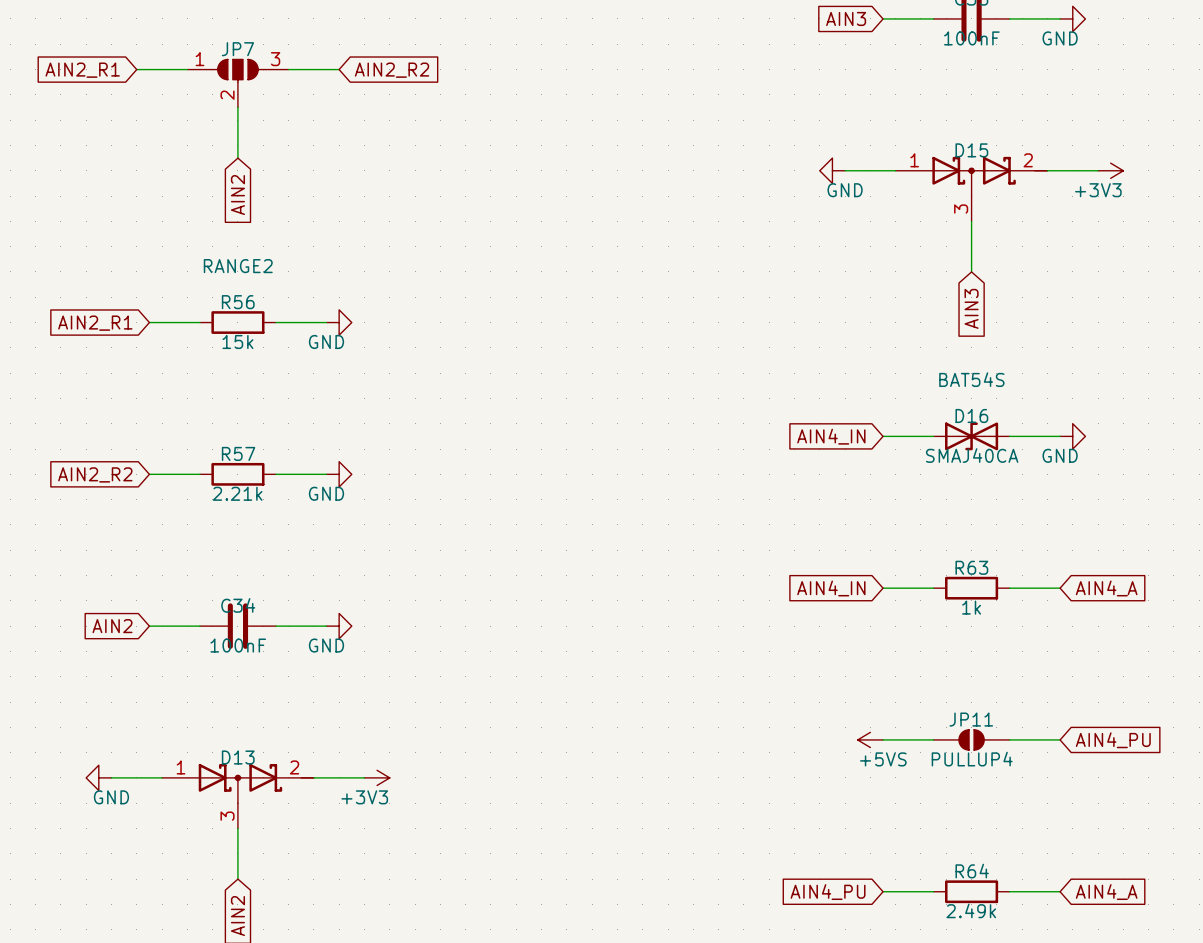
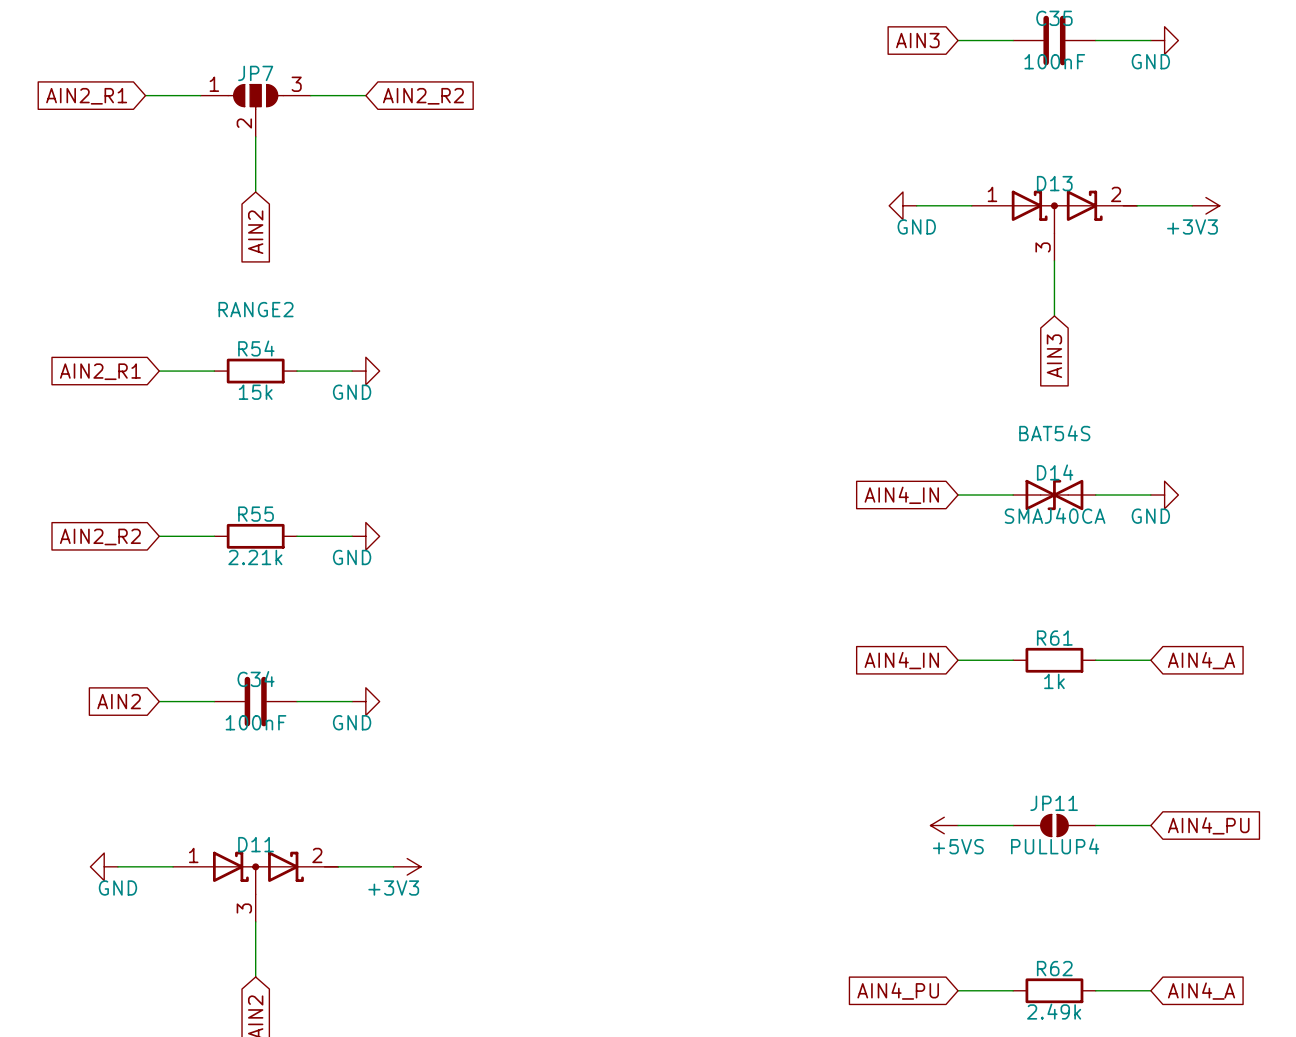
D15 name: D15 (971, 150) -> D13 (1054, 183)
R56 name: R56 (238, 302) -> R54 (256, 348)
D16 name: D16 (971, 415) -> D14 (1055, 472)
R57 name: R57 (238, 453) -> R55 (256, 514)
R63 name: R63 (971, 567) -> R61 (1054, 638)
D13 name: D13 (238, 757) -> D11 (256, 844)
R64 name: R64 (972, 871) -> R62 (1054, 968)

